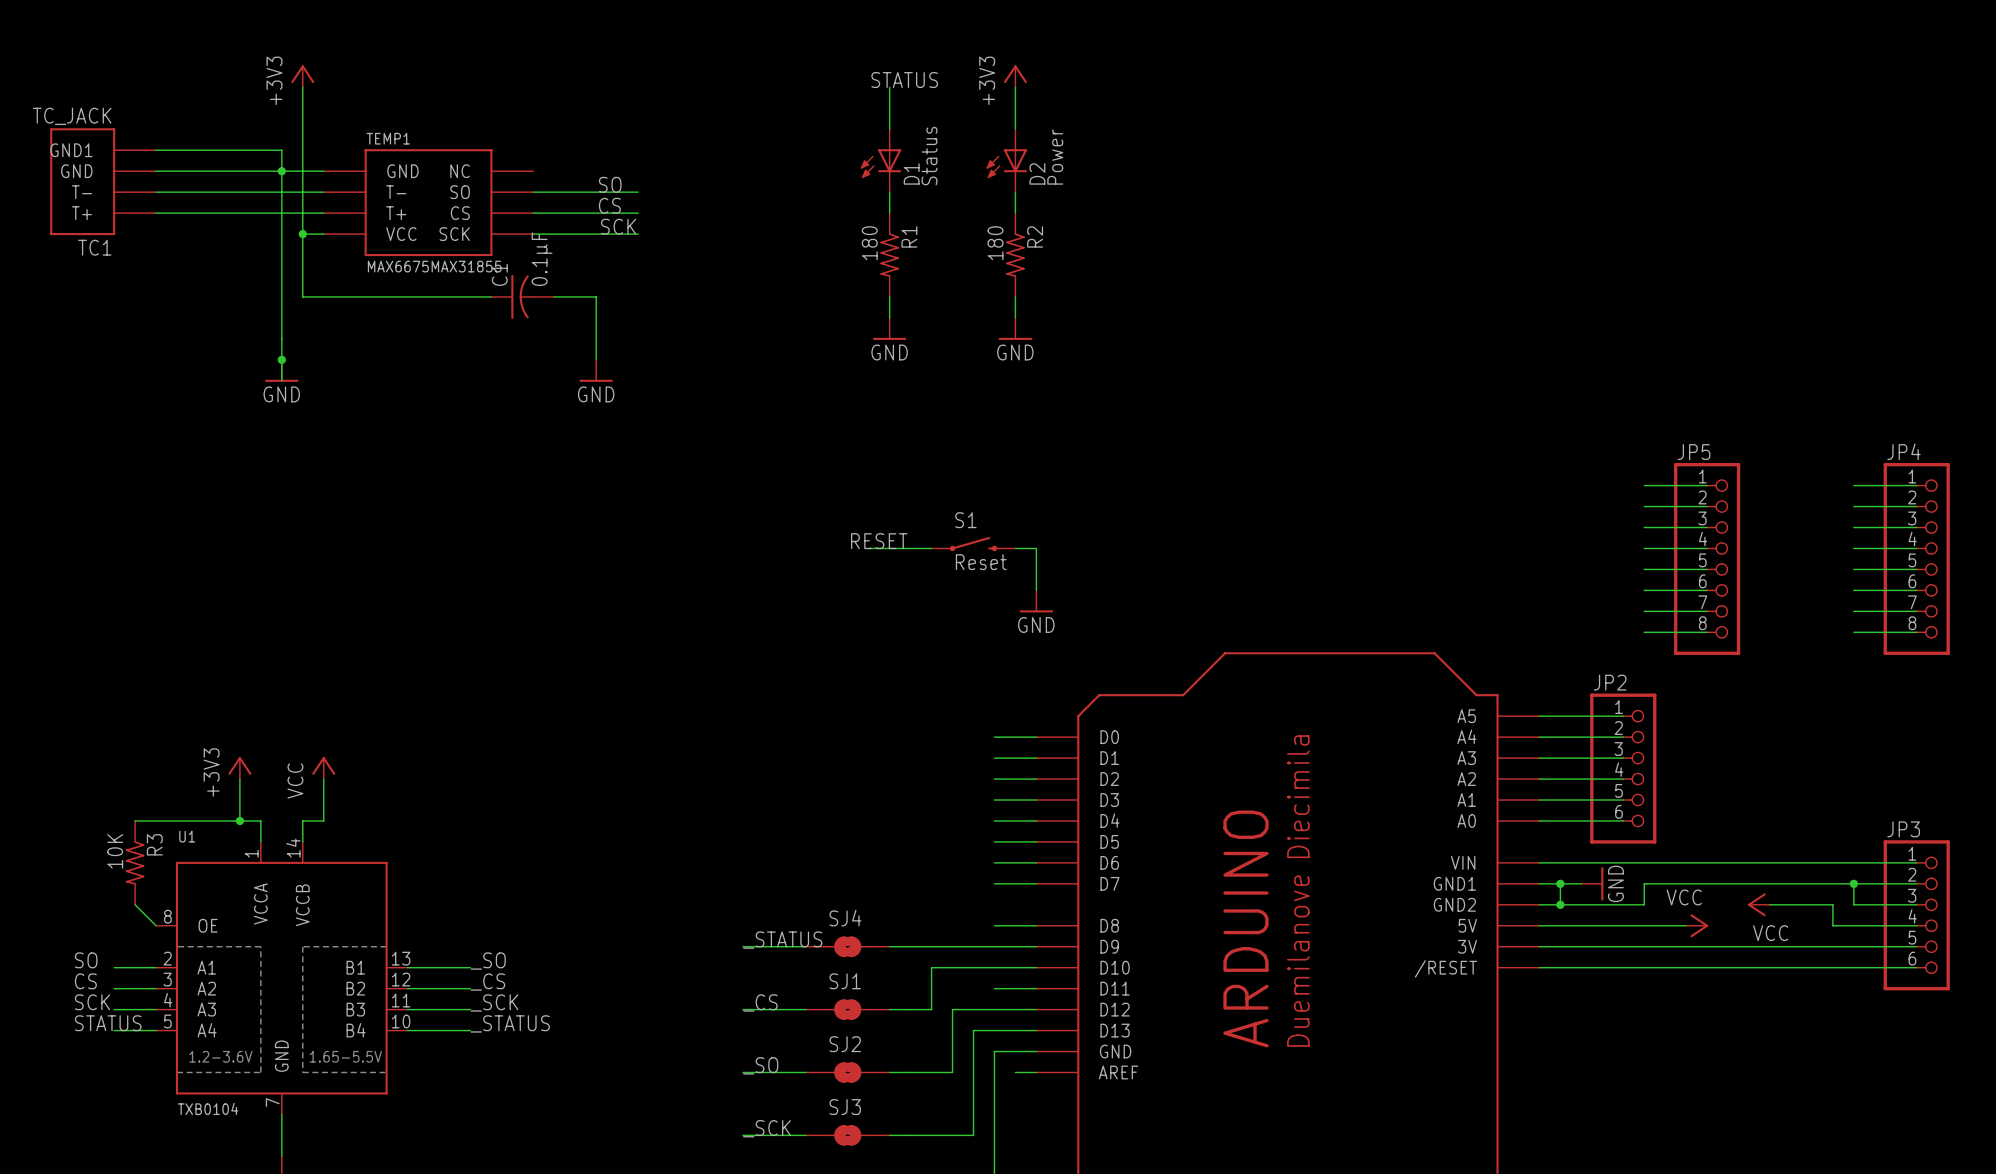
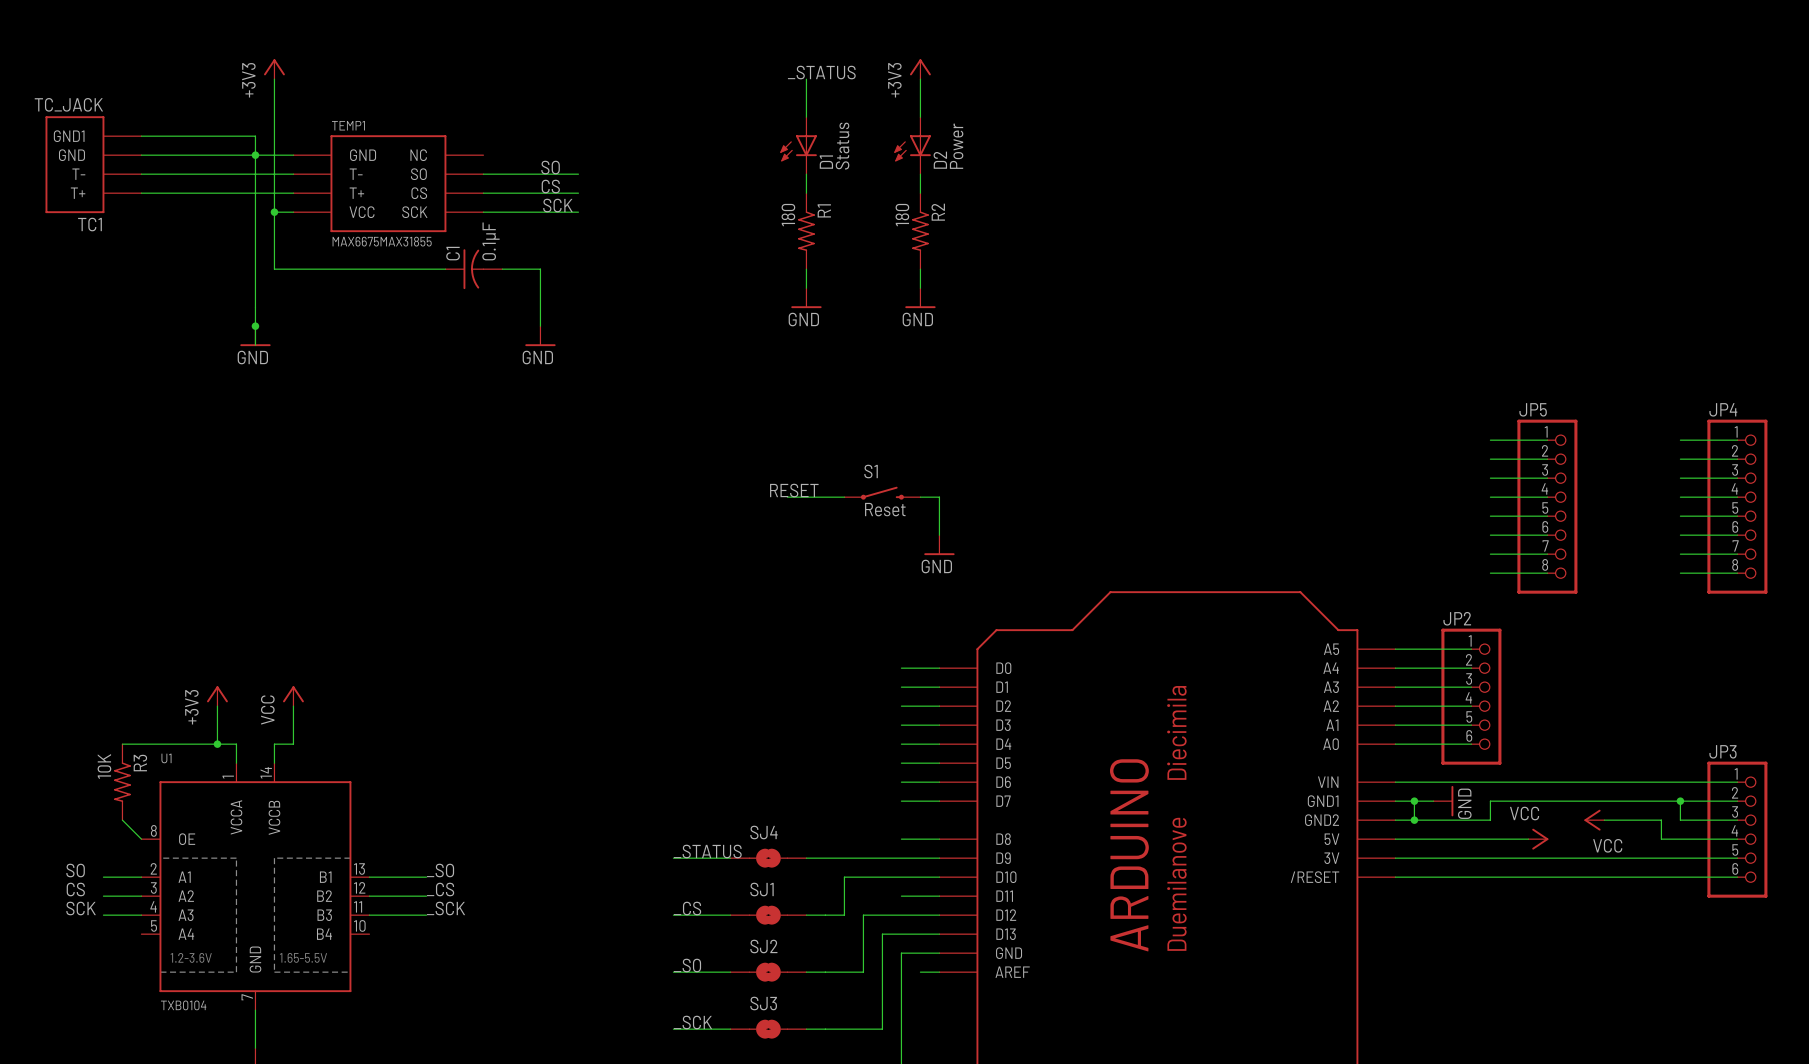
label: STATUS (904, 80) -> _STATUS (821, 72)
label: STATUS (108, 1023) -> none
label: _STATUS (510, 1023) -> none
wire: (114, 1030) (156, 1030) -> none
wire: (407, 1030) (470, 1030) -> none

